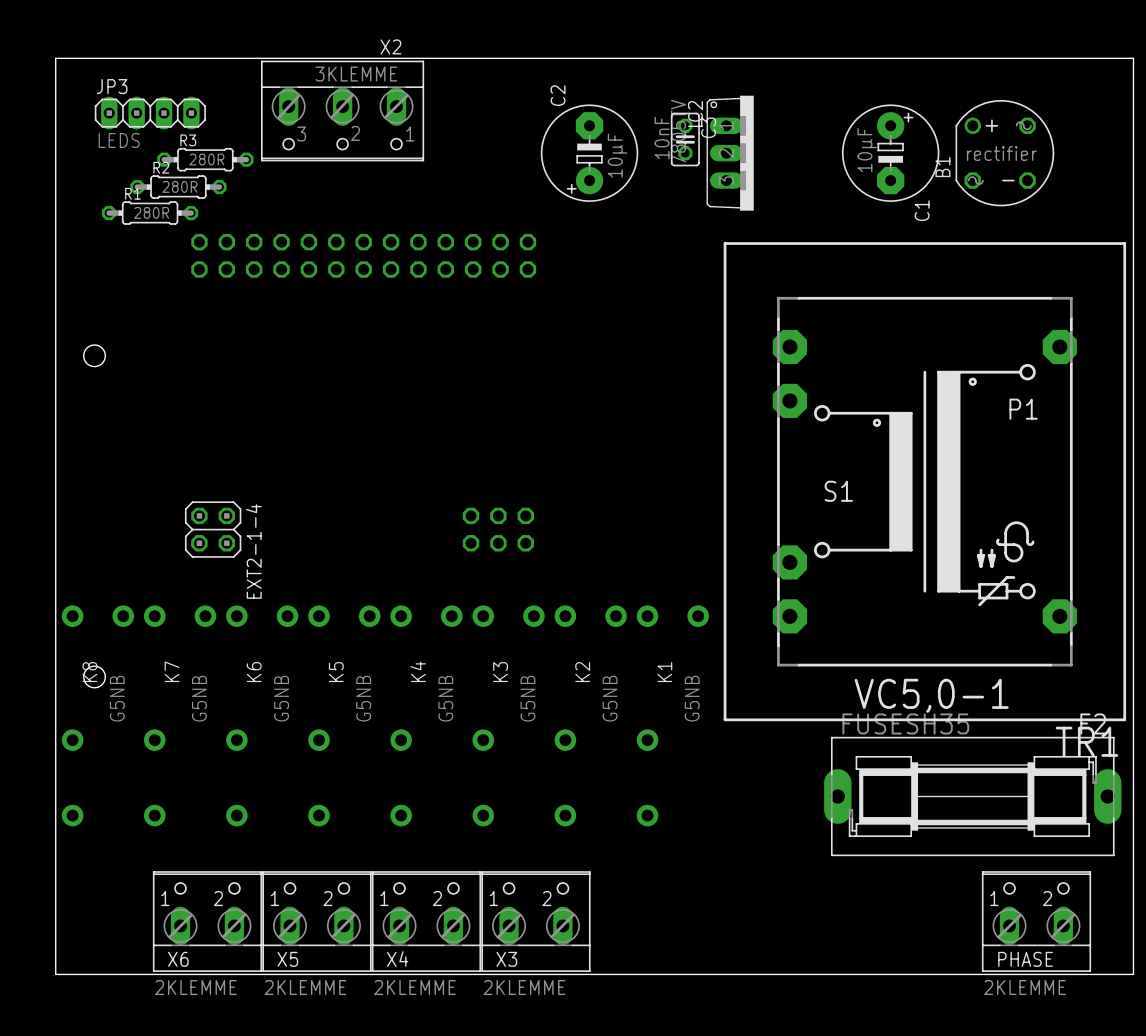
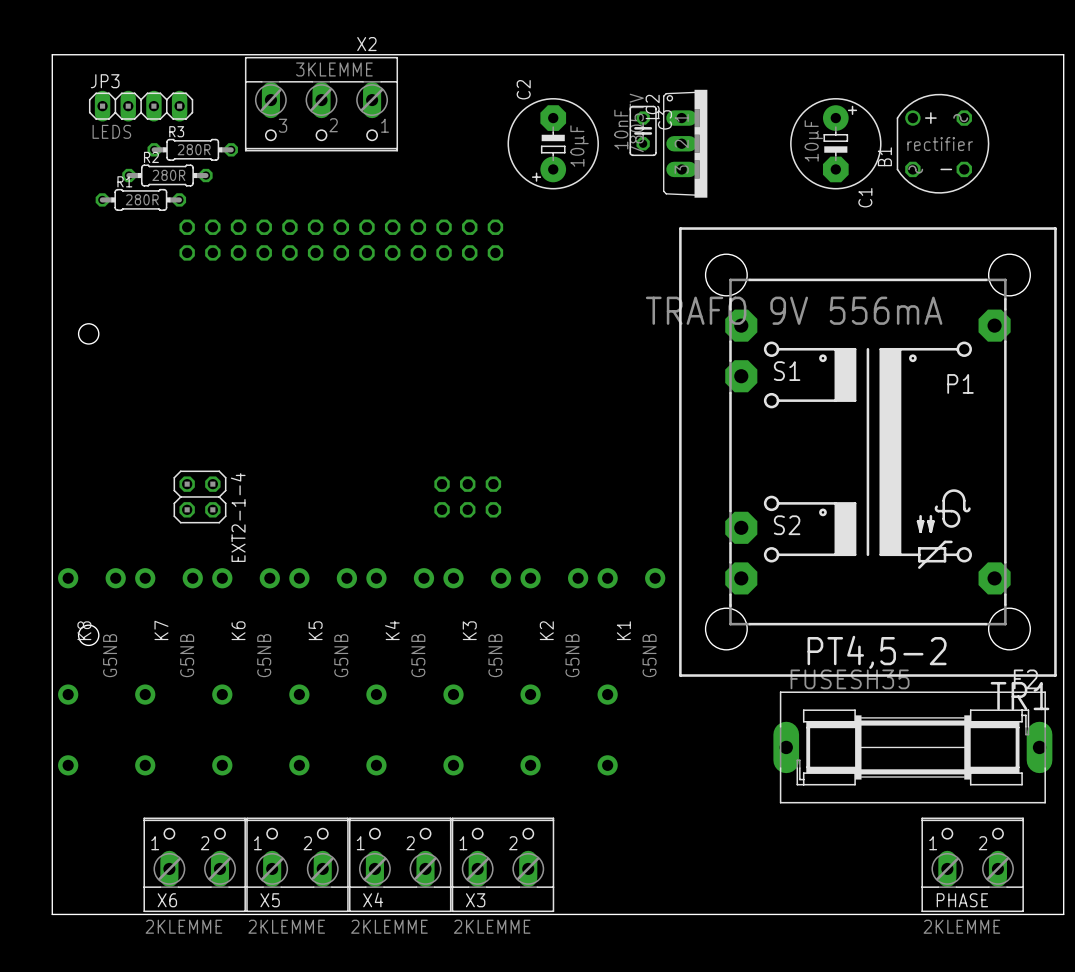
TR1 footprint: [723, 242, 1127, 722] -> [679, 227, 1057, 677]
TR1 value: none -> TRAFO 9V 556mA (794, 310)

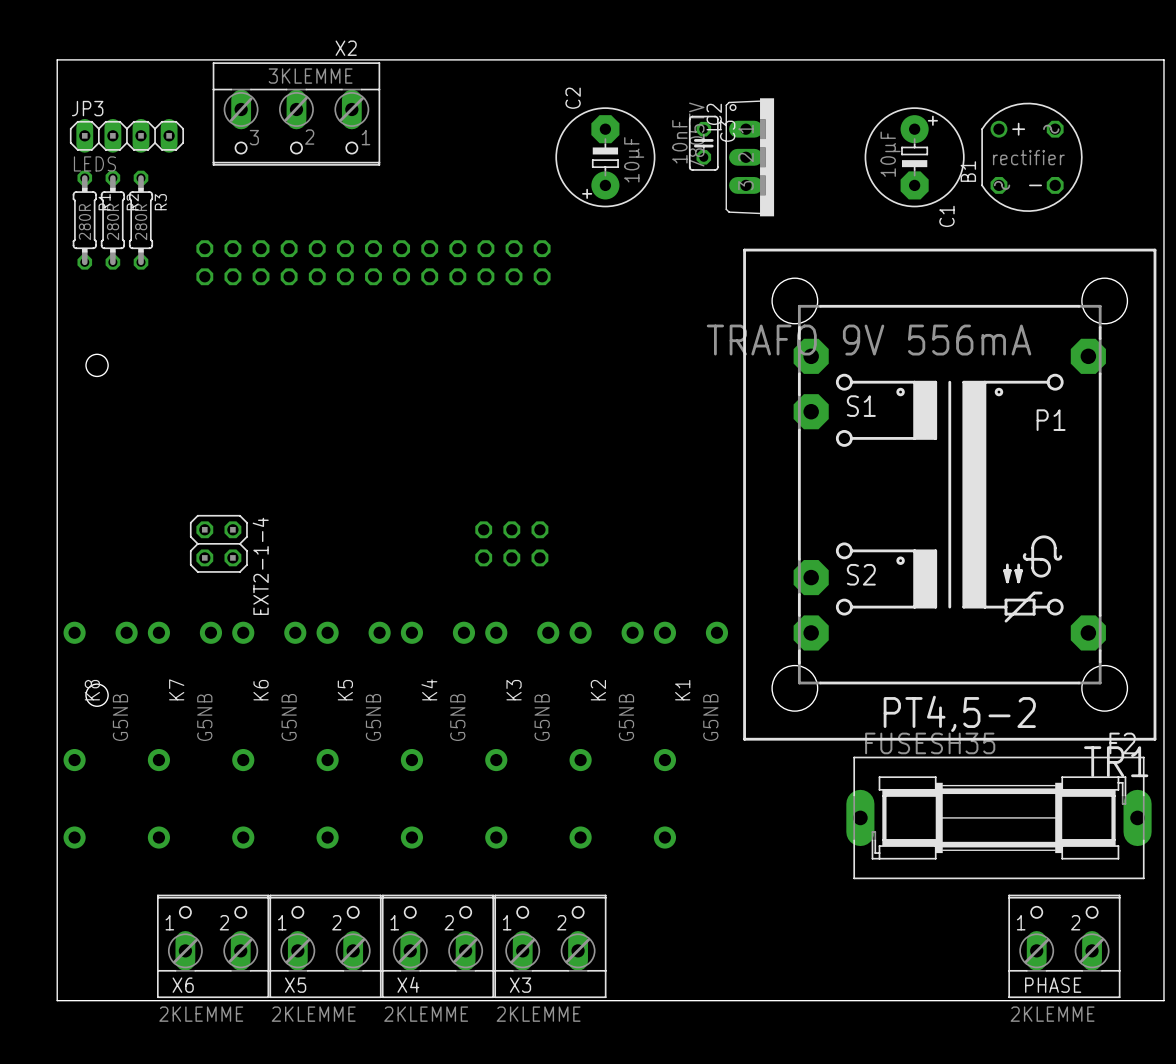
X2 position: (321, 104) -> (296, 113)
JP3 position: (141, 106) -> (126, 135)
R3 rotation: 0° (192, 149) -> 90° clockwise (141, 220)
R3 position: (192, 149) -> (141, 220)
R2 rotation: 0° (167, 175) -> 90° clockwise (112, 220)
R2 position: (167, 175) -> (112, 220)
R1 rotation: 0° (140, 199) -> 90° clockwise (84, 220)
R1 position: (140, 199) -> (84, 220)

